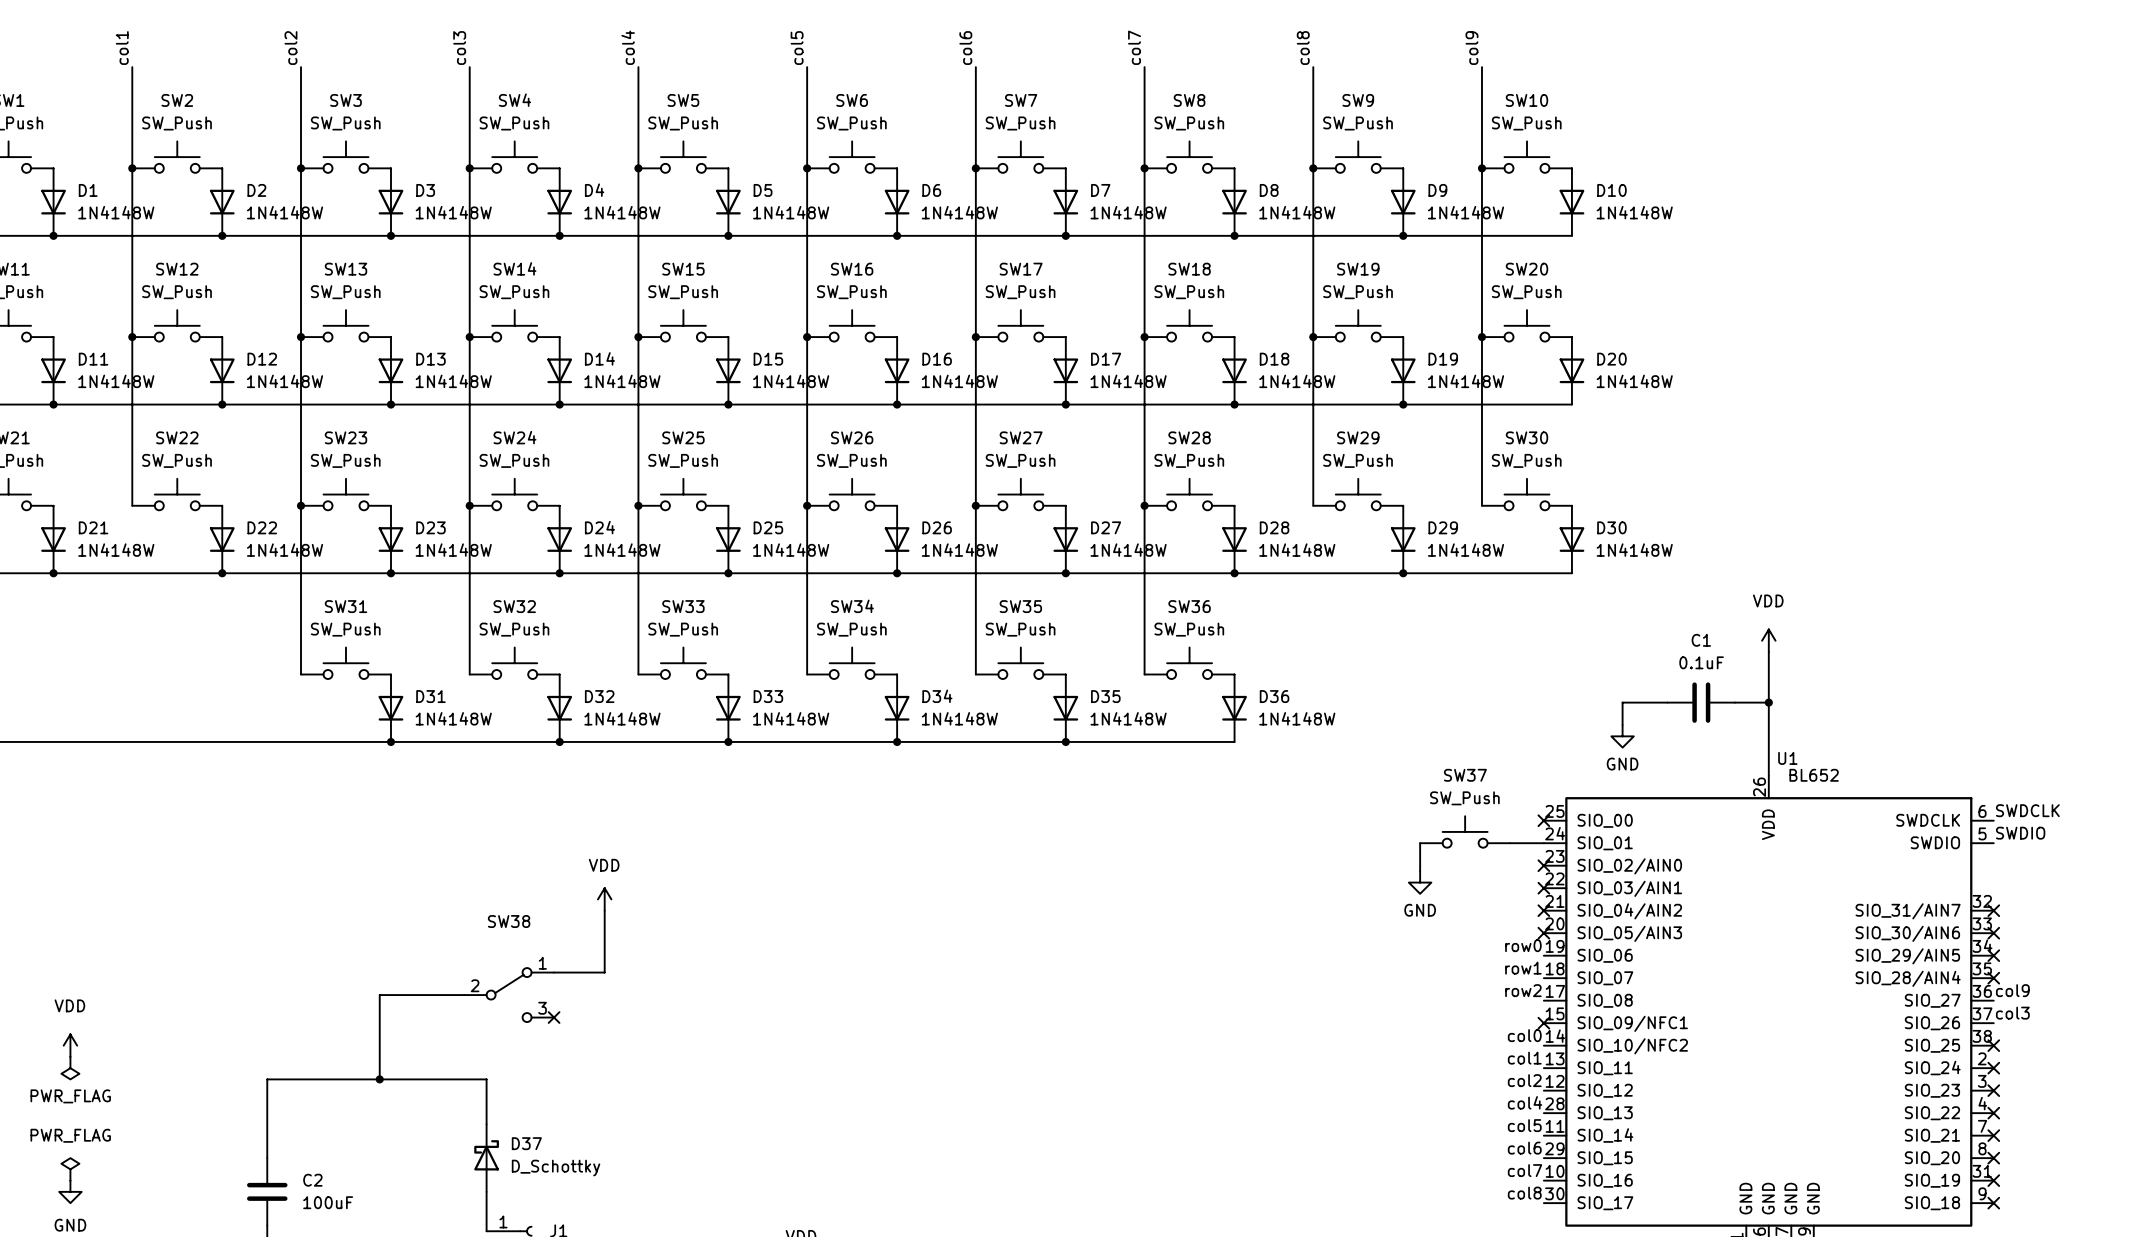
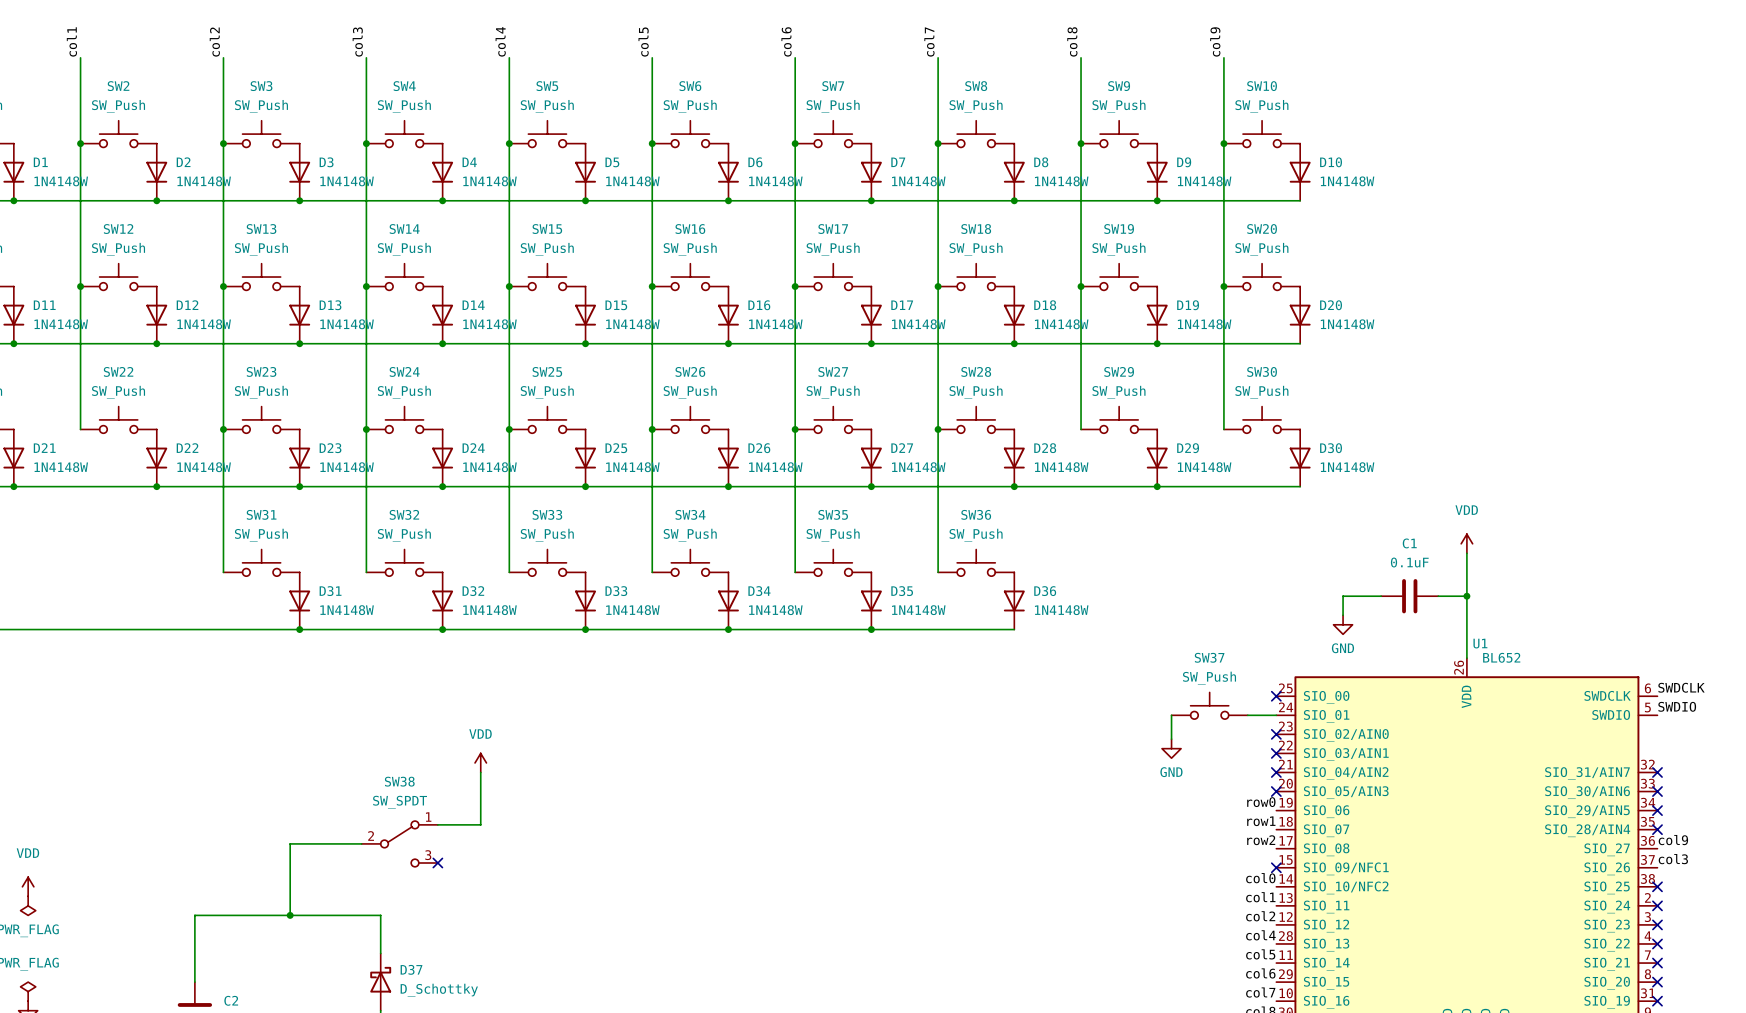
SW38 value: none -> SW_SPDT (400, 802)

